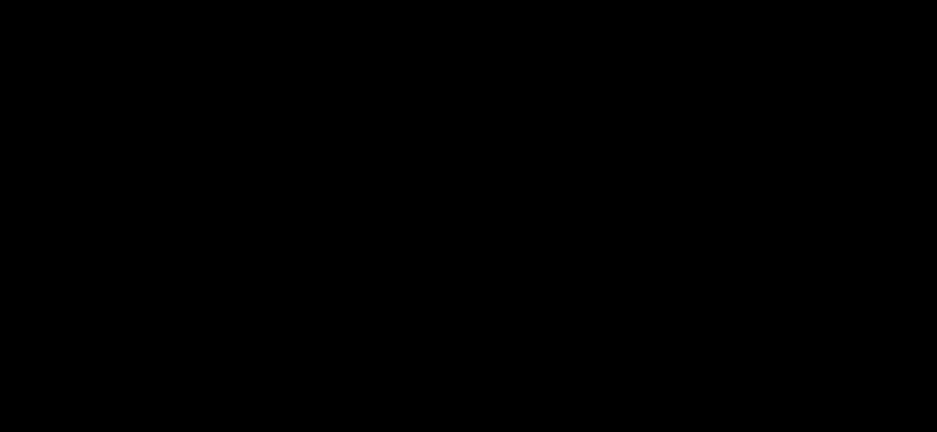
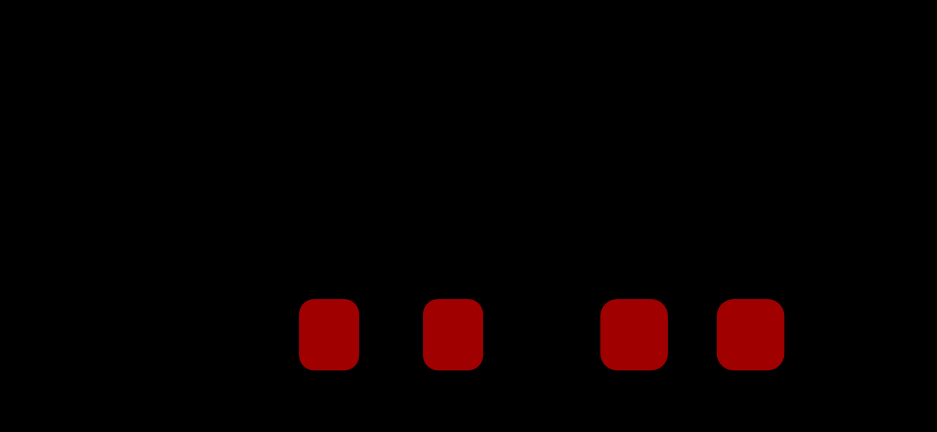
part: none -> (391, 334)
part: none -> (692, 334)

